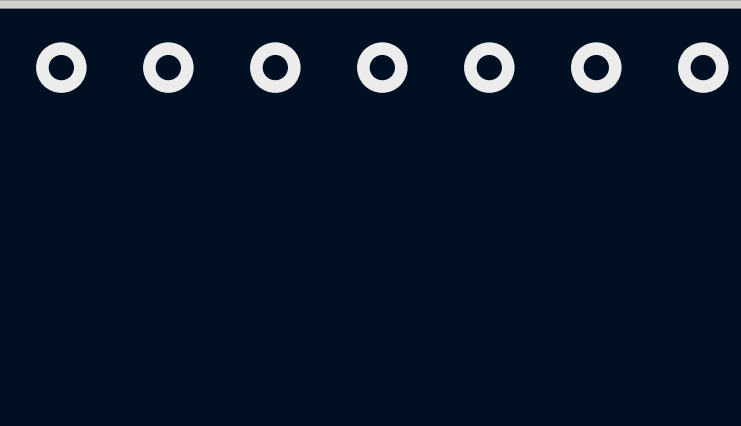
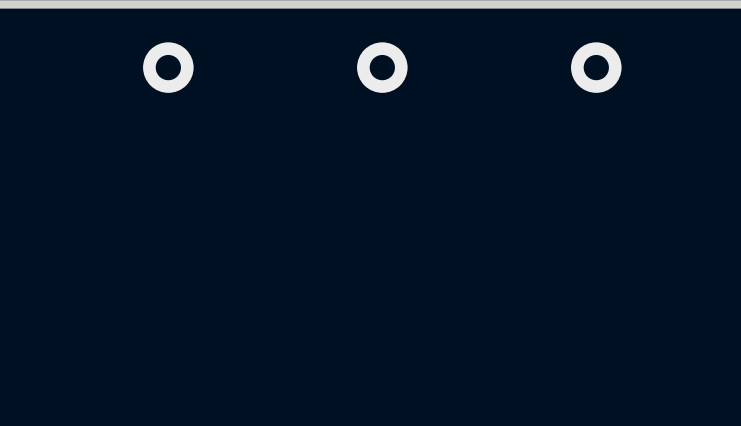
via: (61, 67) -> none
via: (275, 67) -> none
via: (489, 67) -> none
via: (703, 67) -> none

